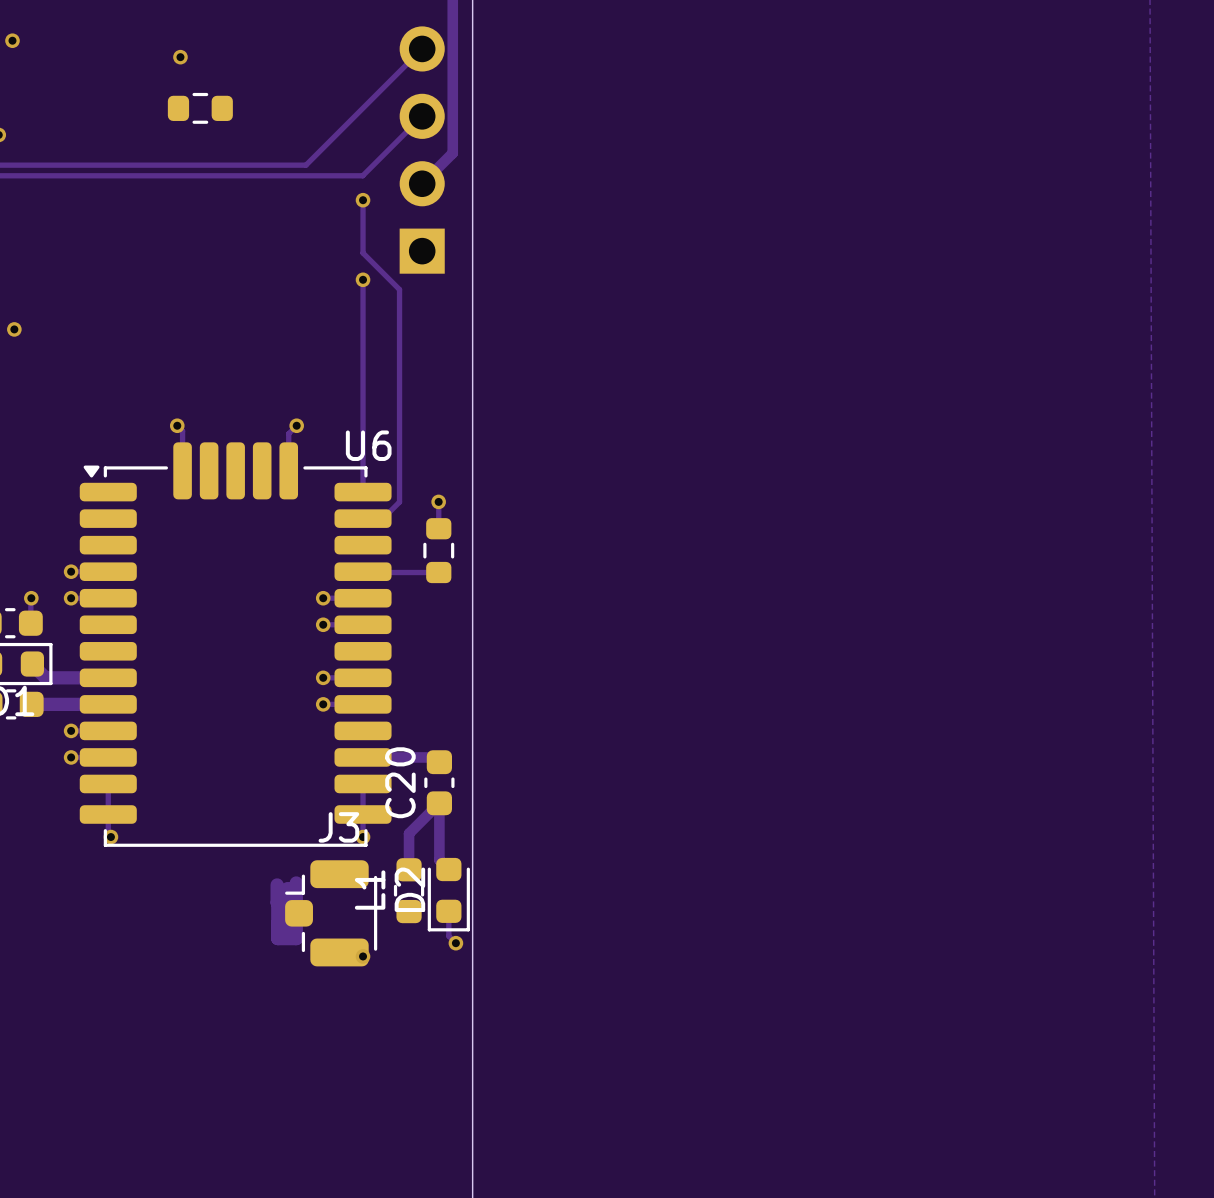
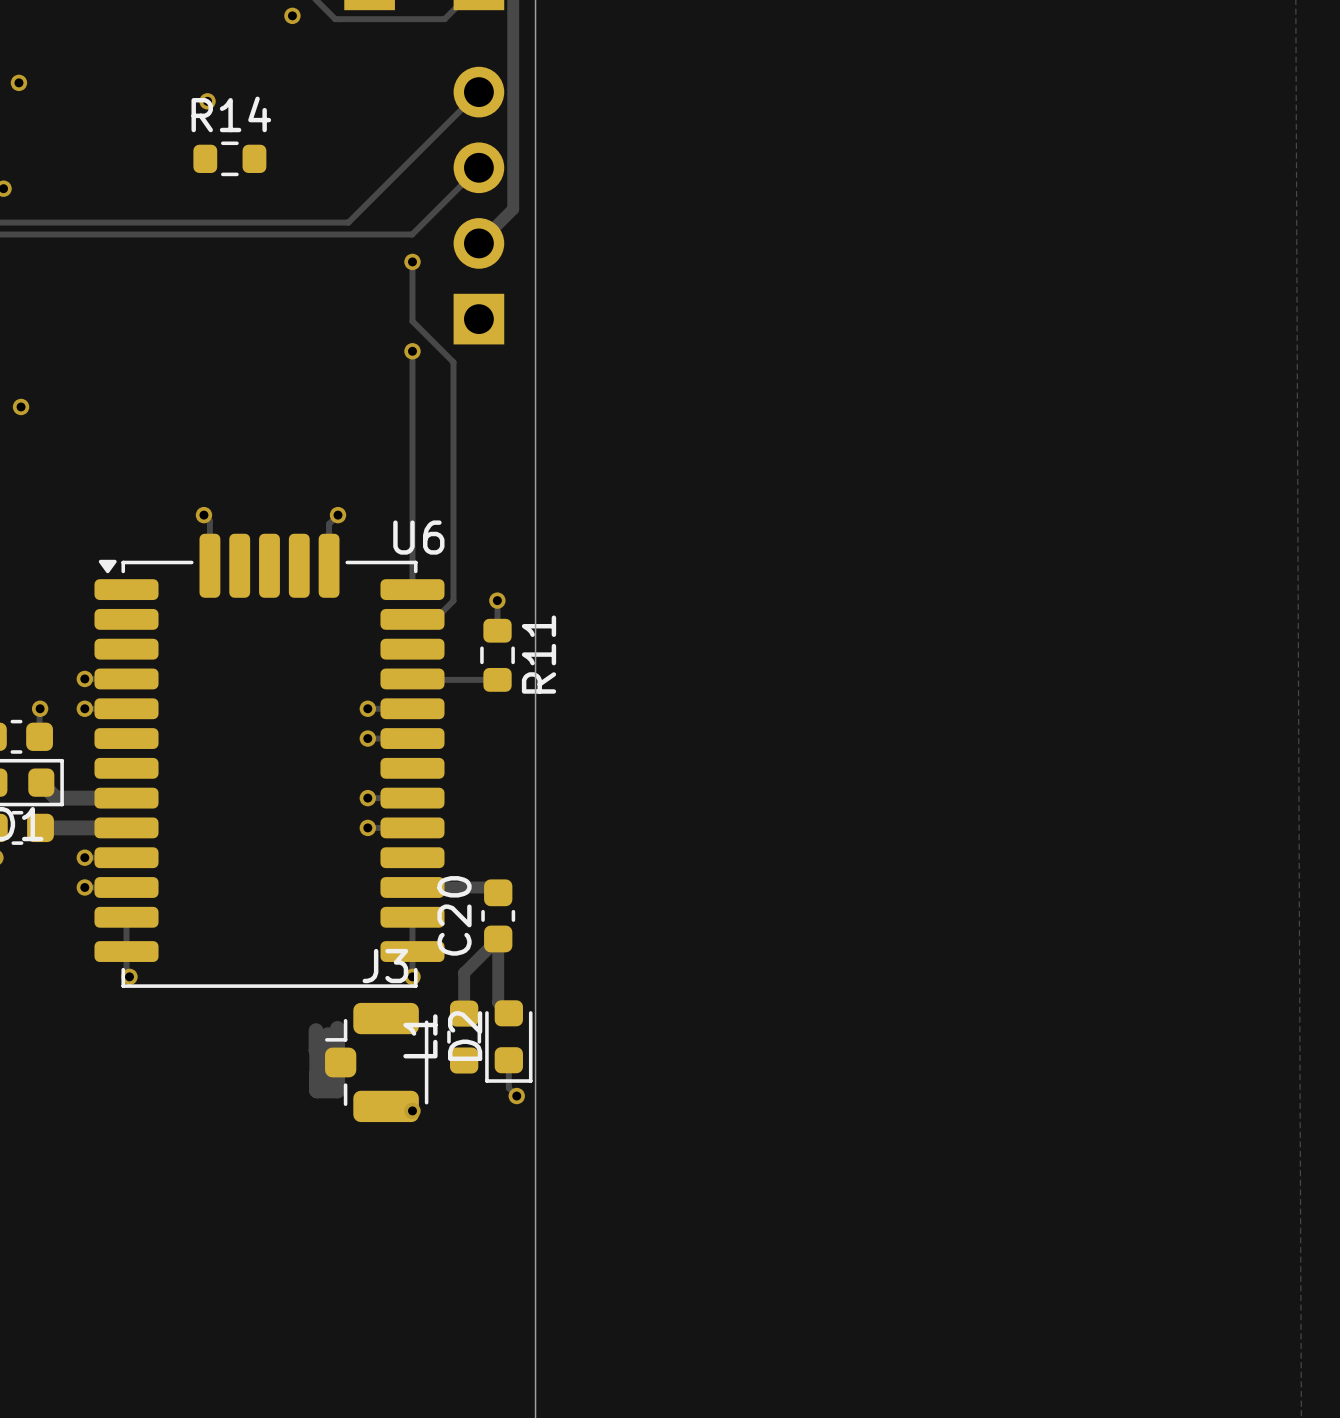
R14 name: none -> R14 (231, 114)
R11 name: none -> R11 (539, 654)

